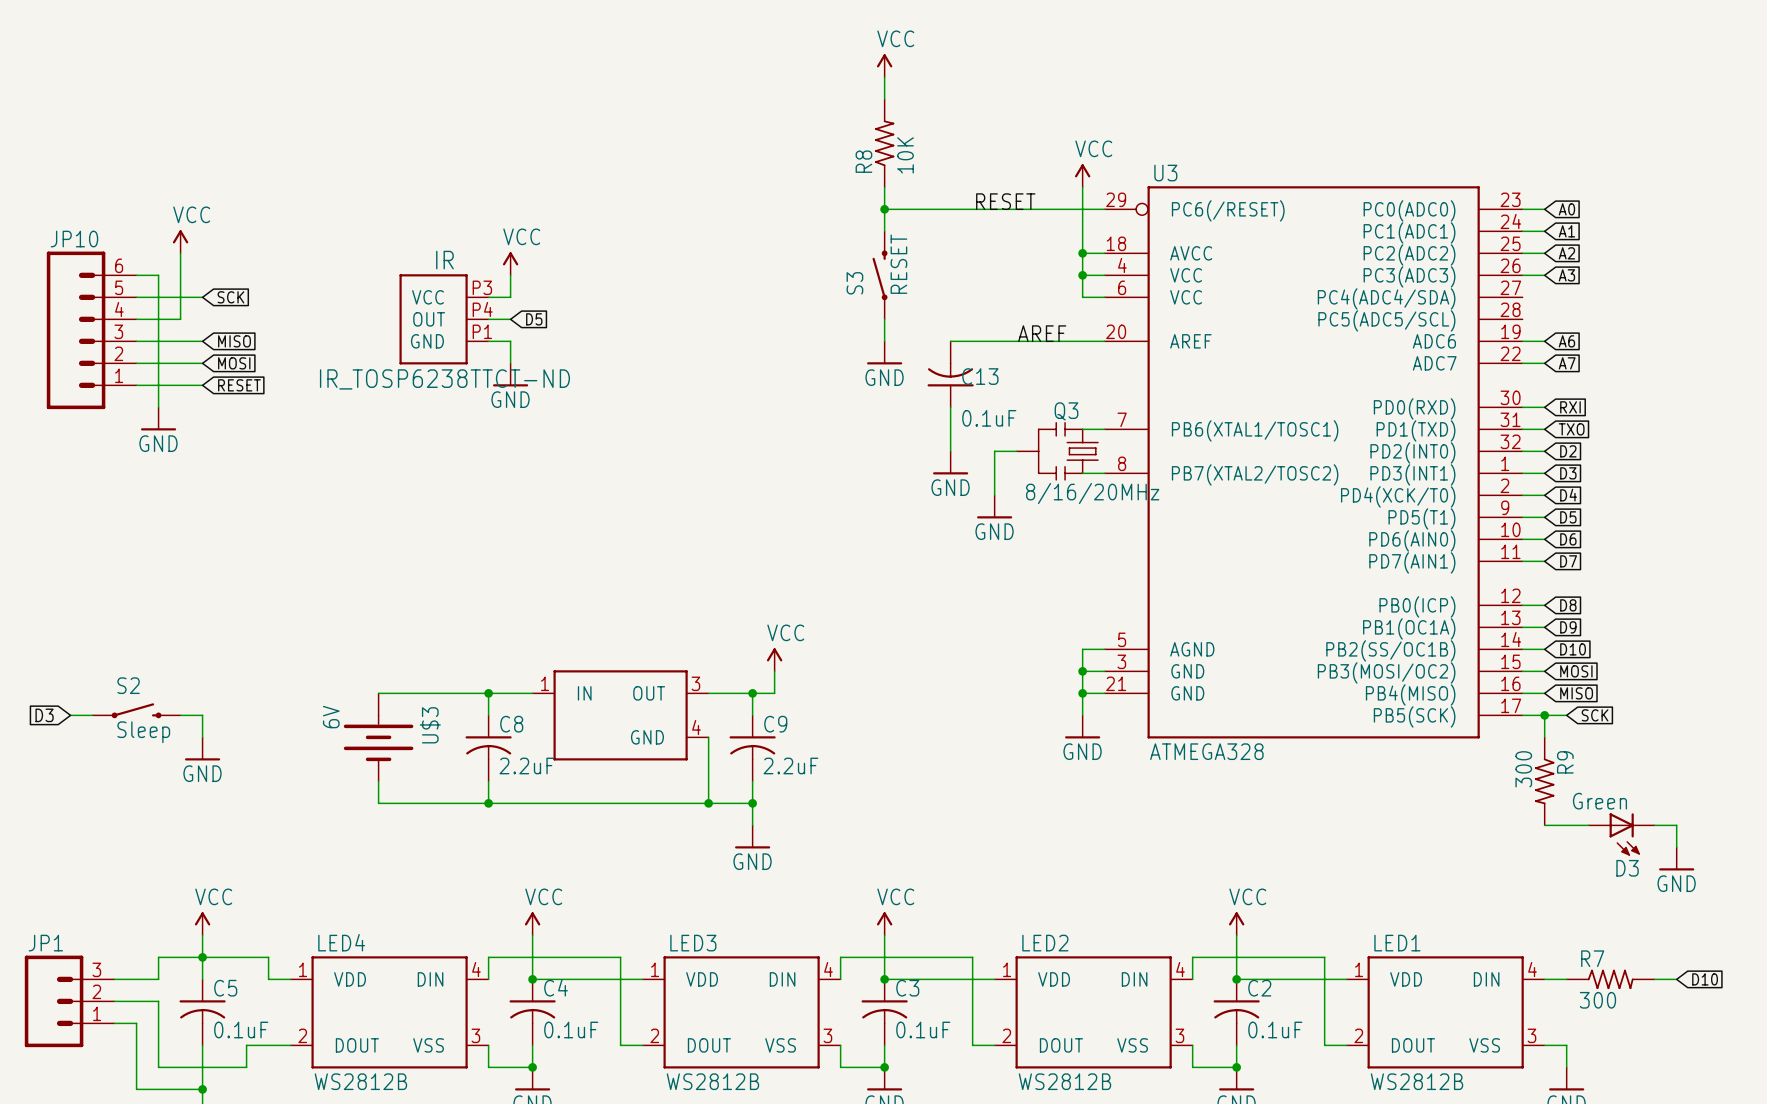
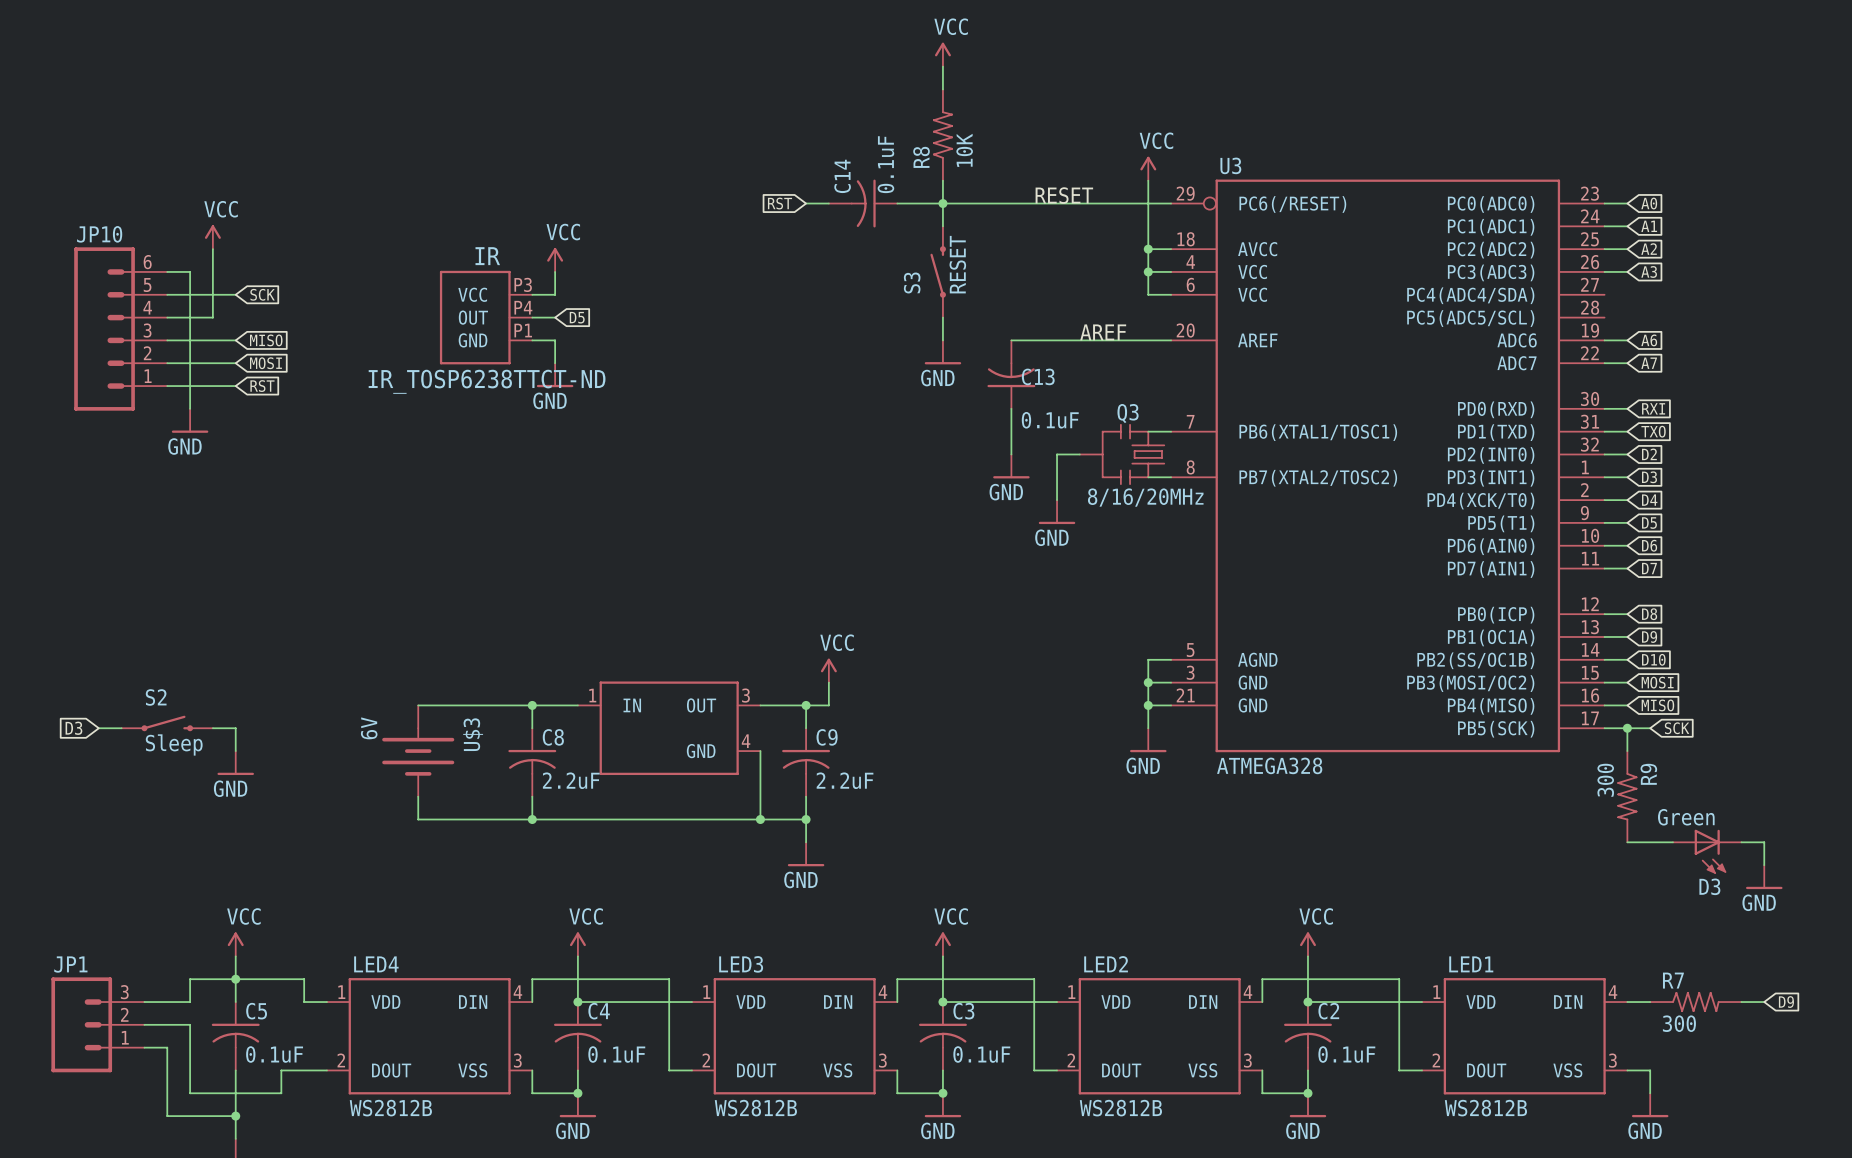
global label: none -> RST (780, 203)
wire: none -> (806, 203) (828, 203)
C14: none -> 0.1uF (863, 203)
wire: none -> (897, 203) (942, 203)
global label: RESET (239, 385) -> RST (262, 386)
global label: D10 (1705, 979) -> D9 (1786, 1002)

